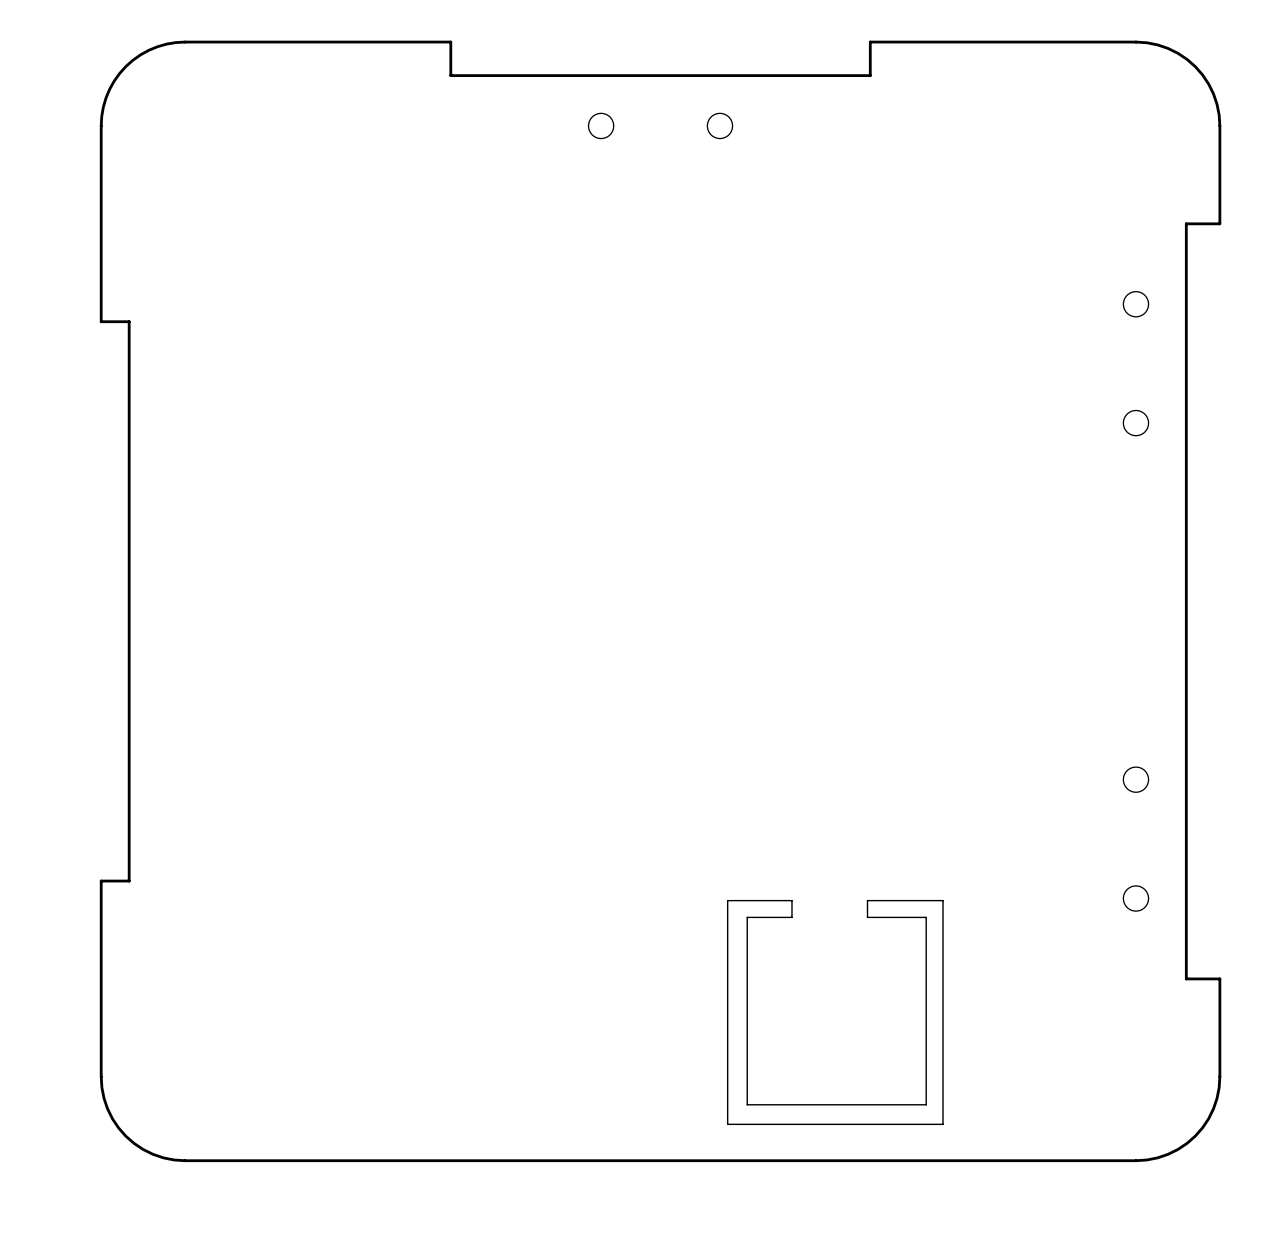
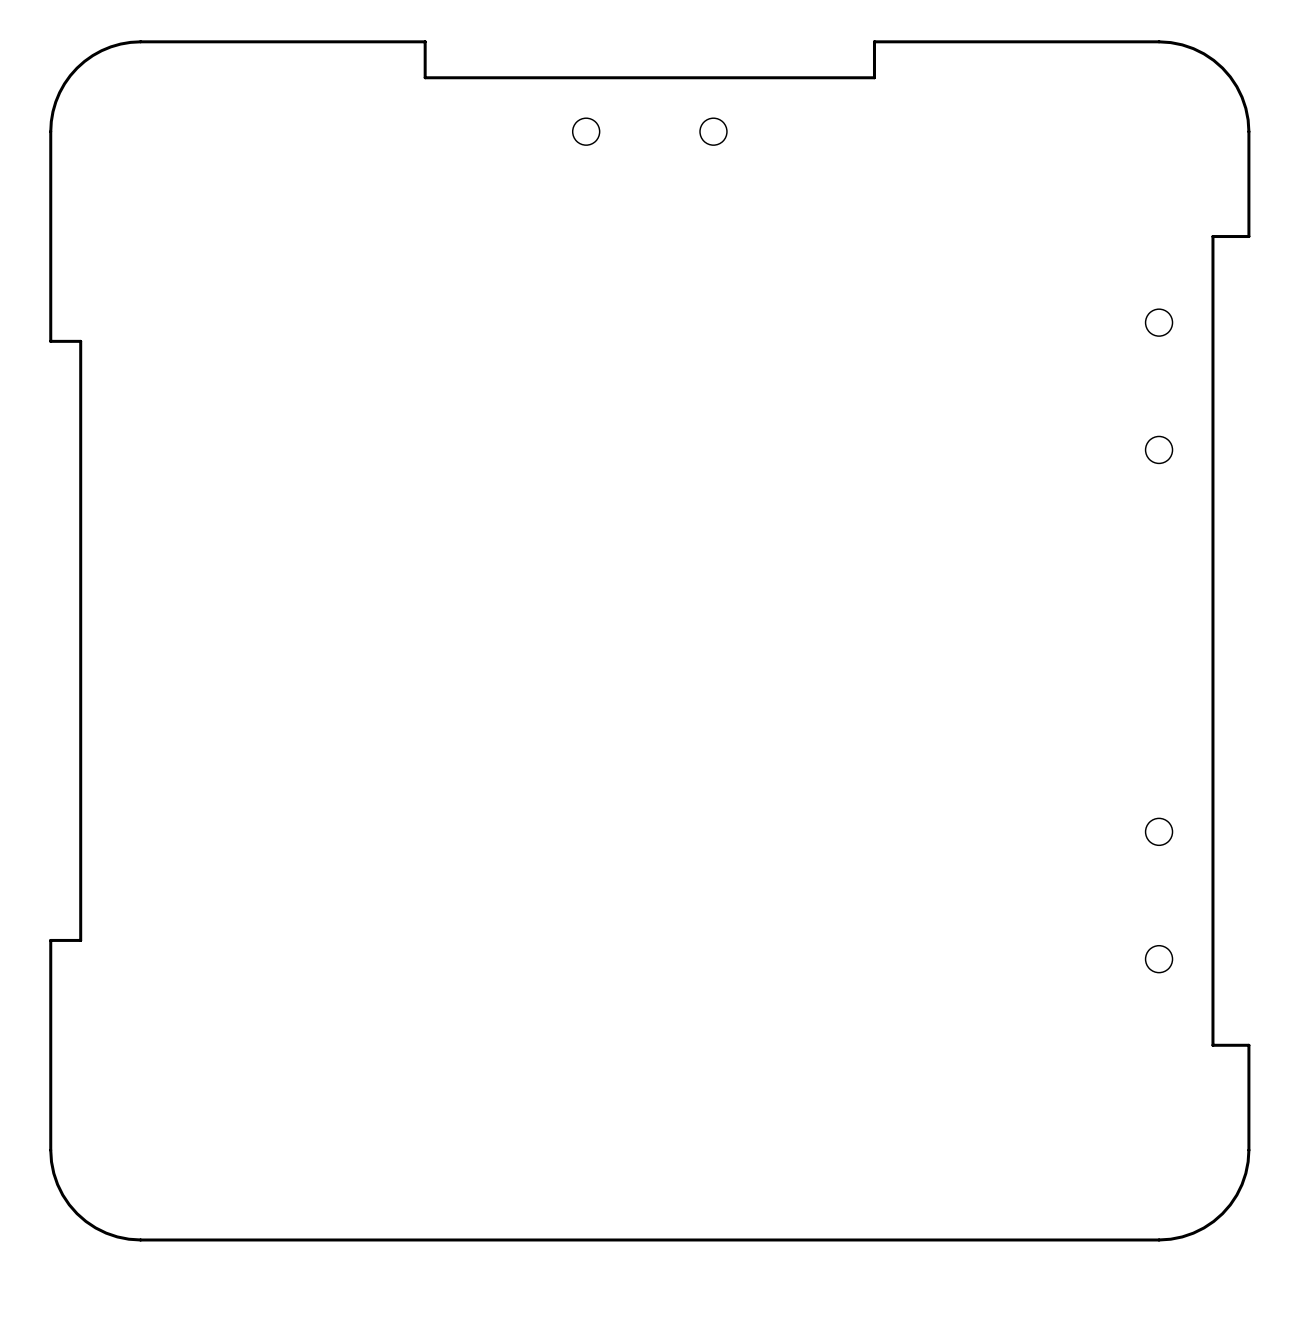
board edge: (943, 900) (867, 900) (867, 917) (926, 917) (926, 1104) (747, 1104) (747, 917) (791, 917) (791, 900) (727, 900) (727, 1124) (943, 1124) (943, 900) -> none

